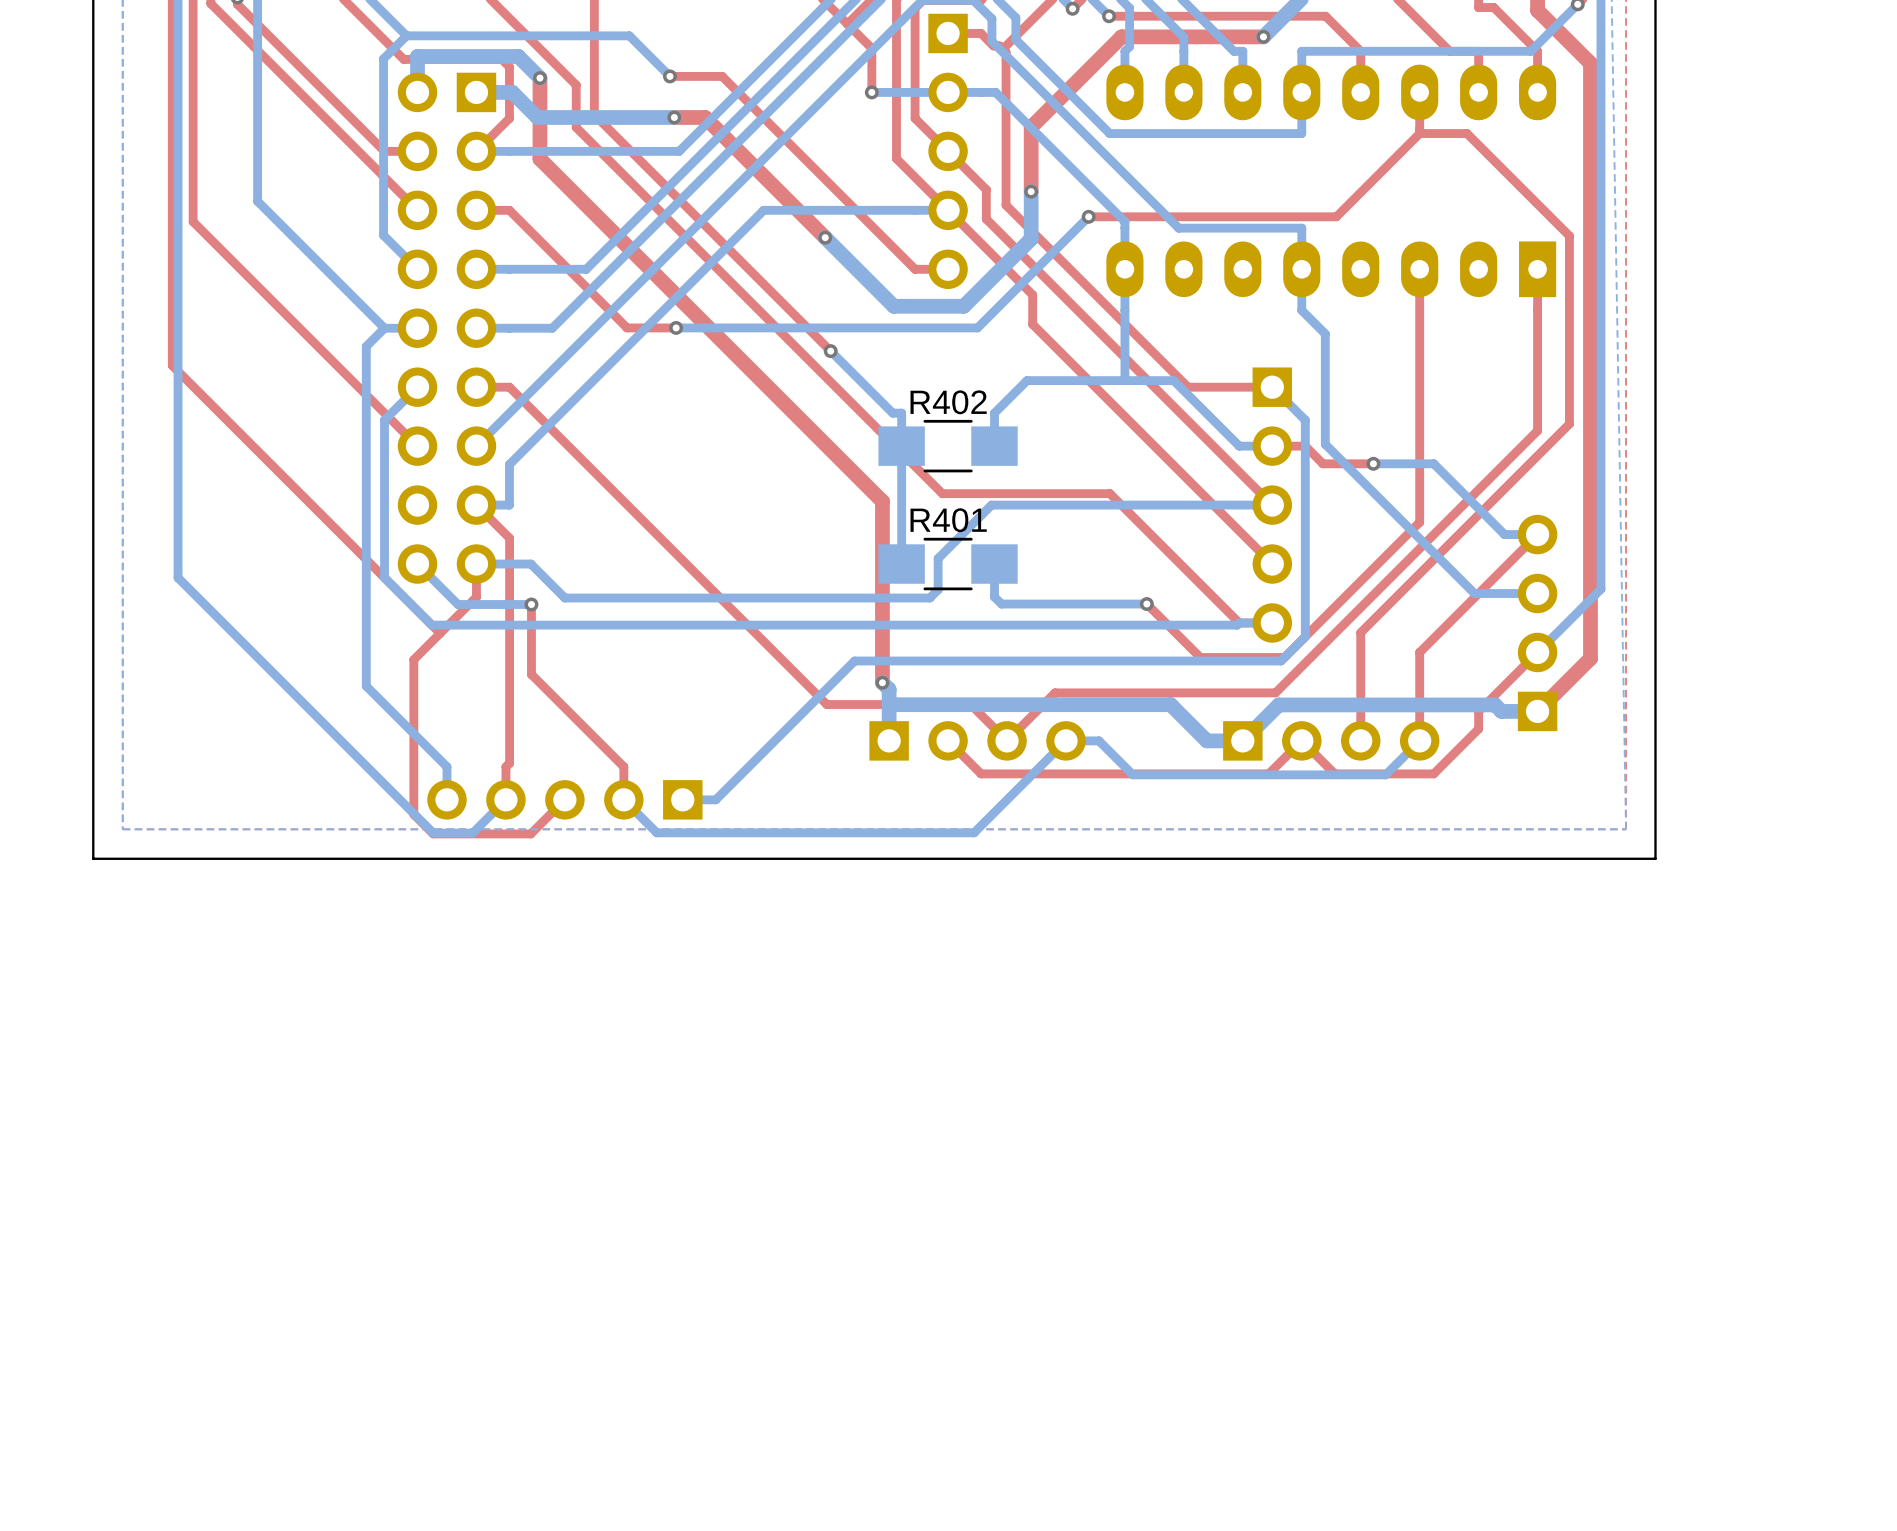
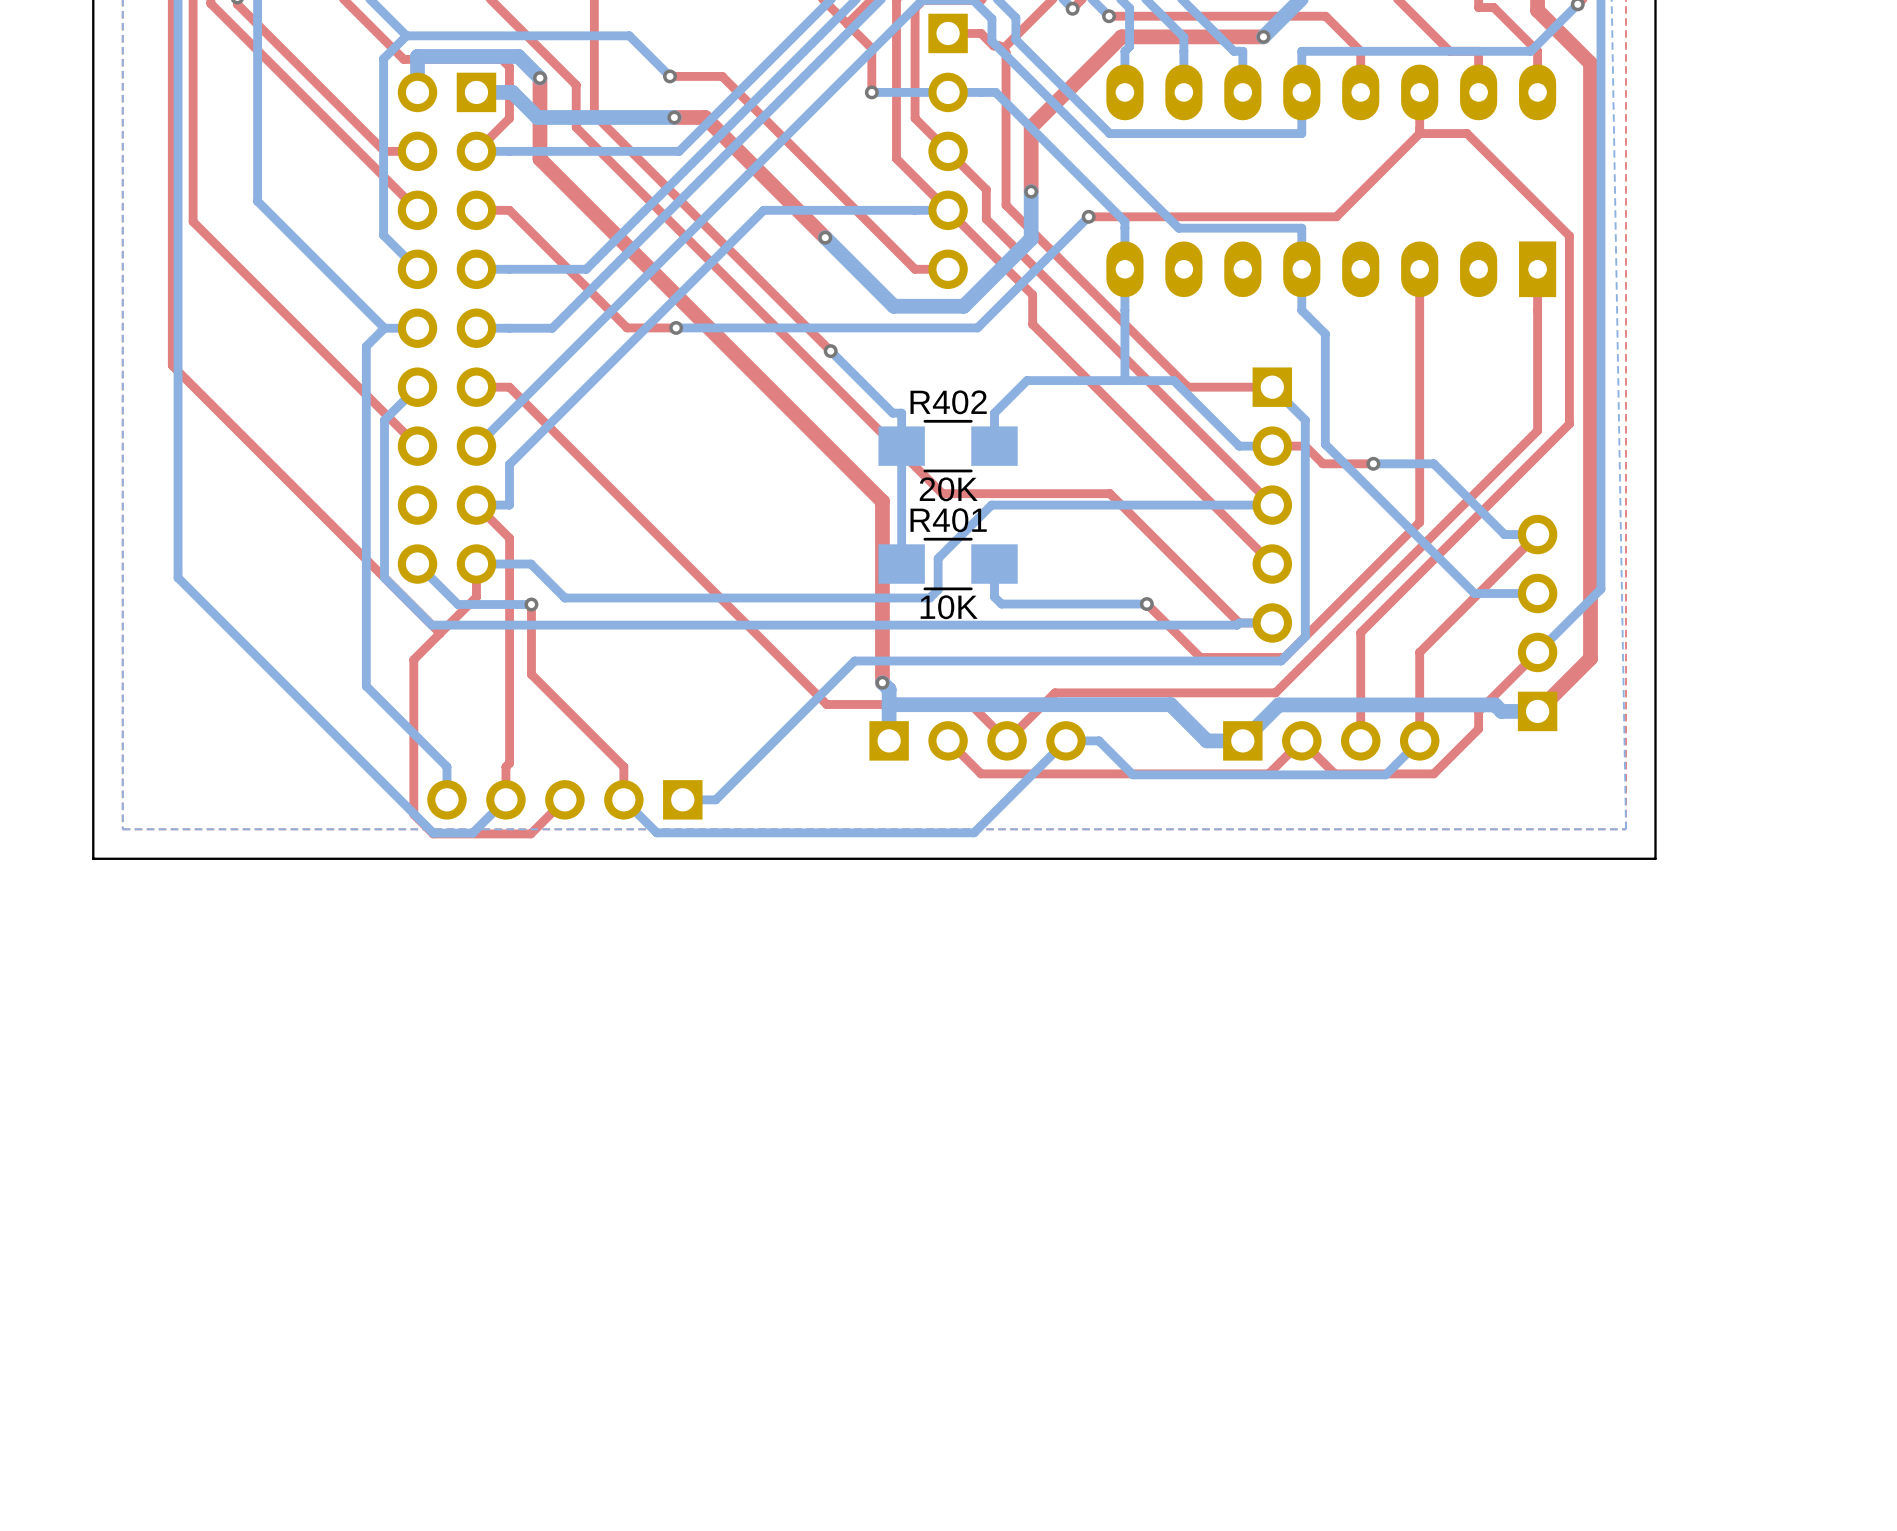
R402 value: none -> 20K (948, 489)
R401 value: none -> 10K (949, 607)

